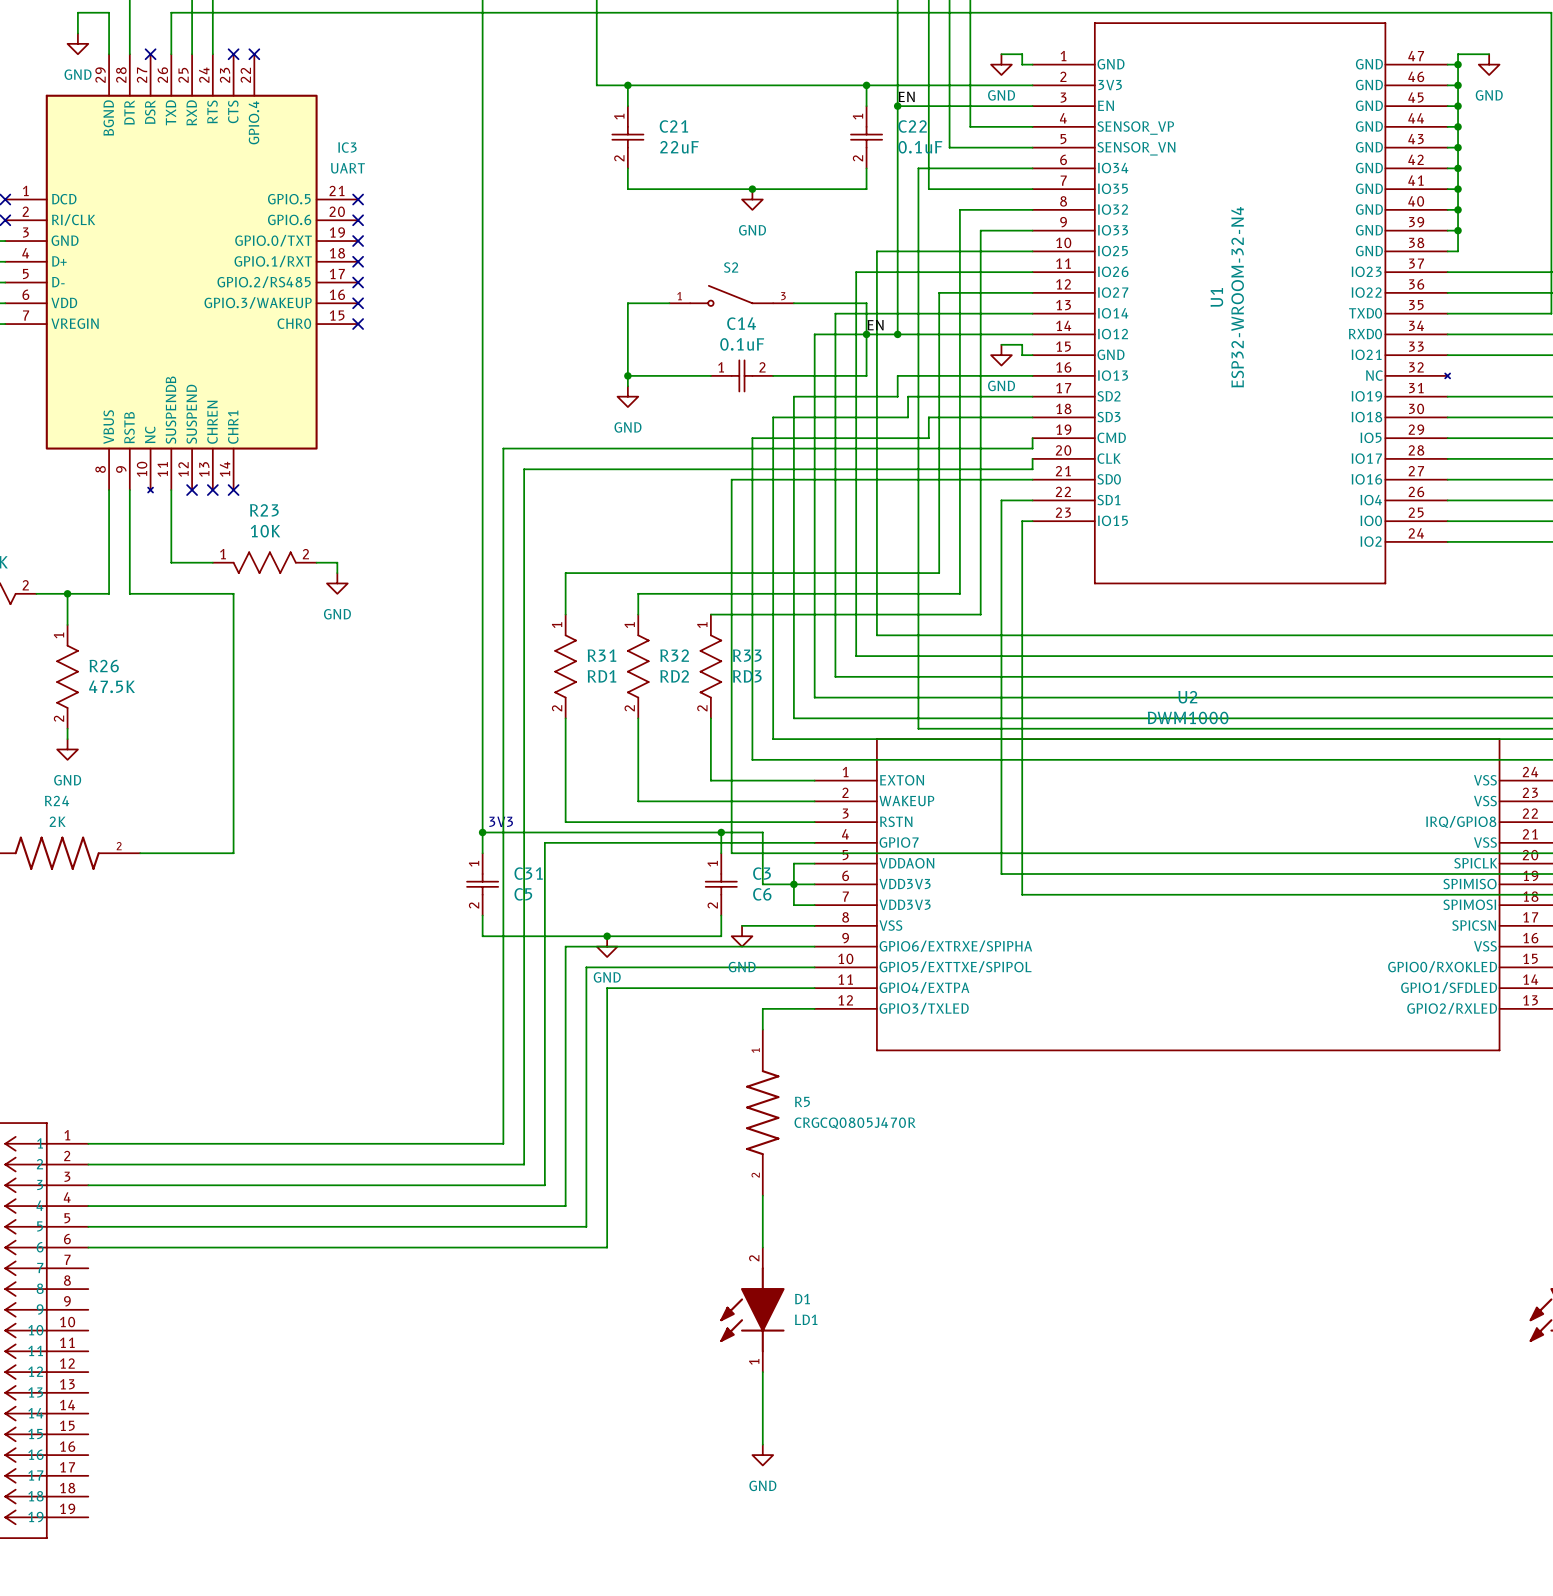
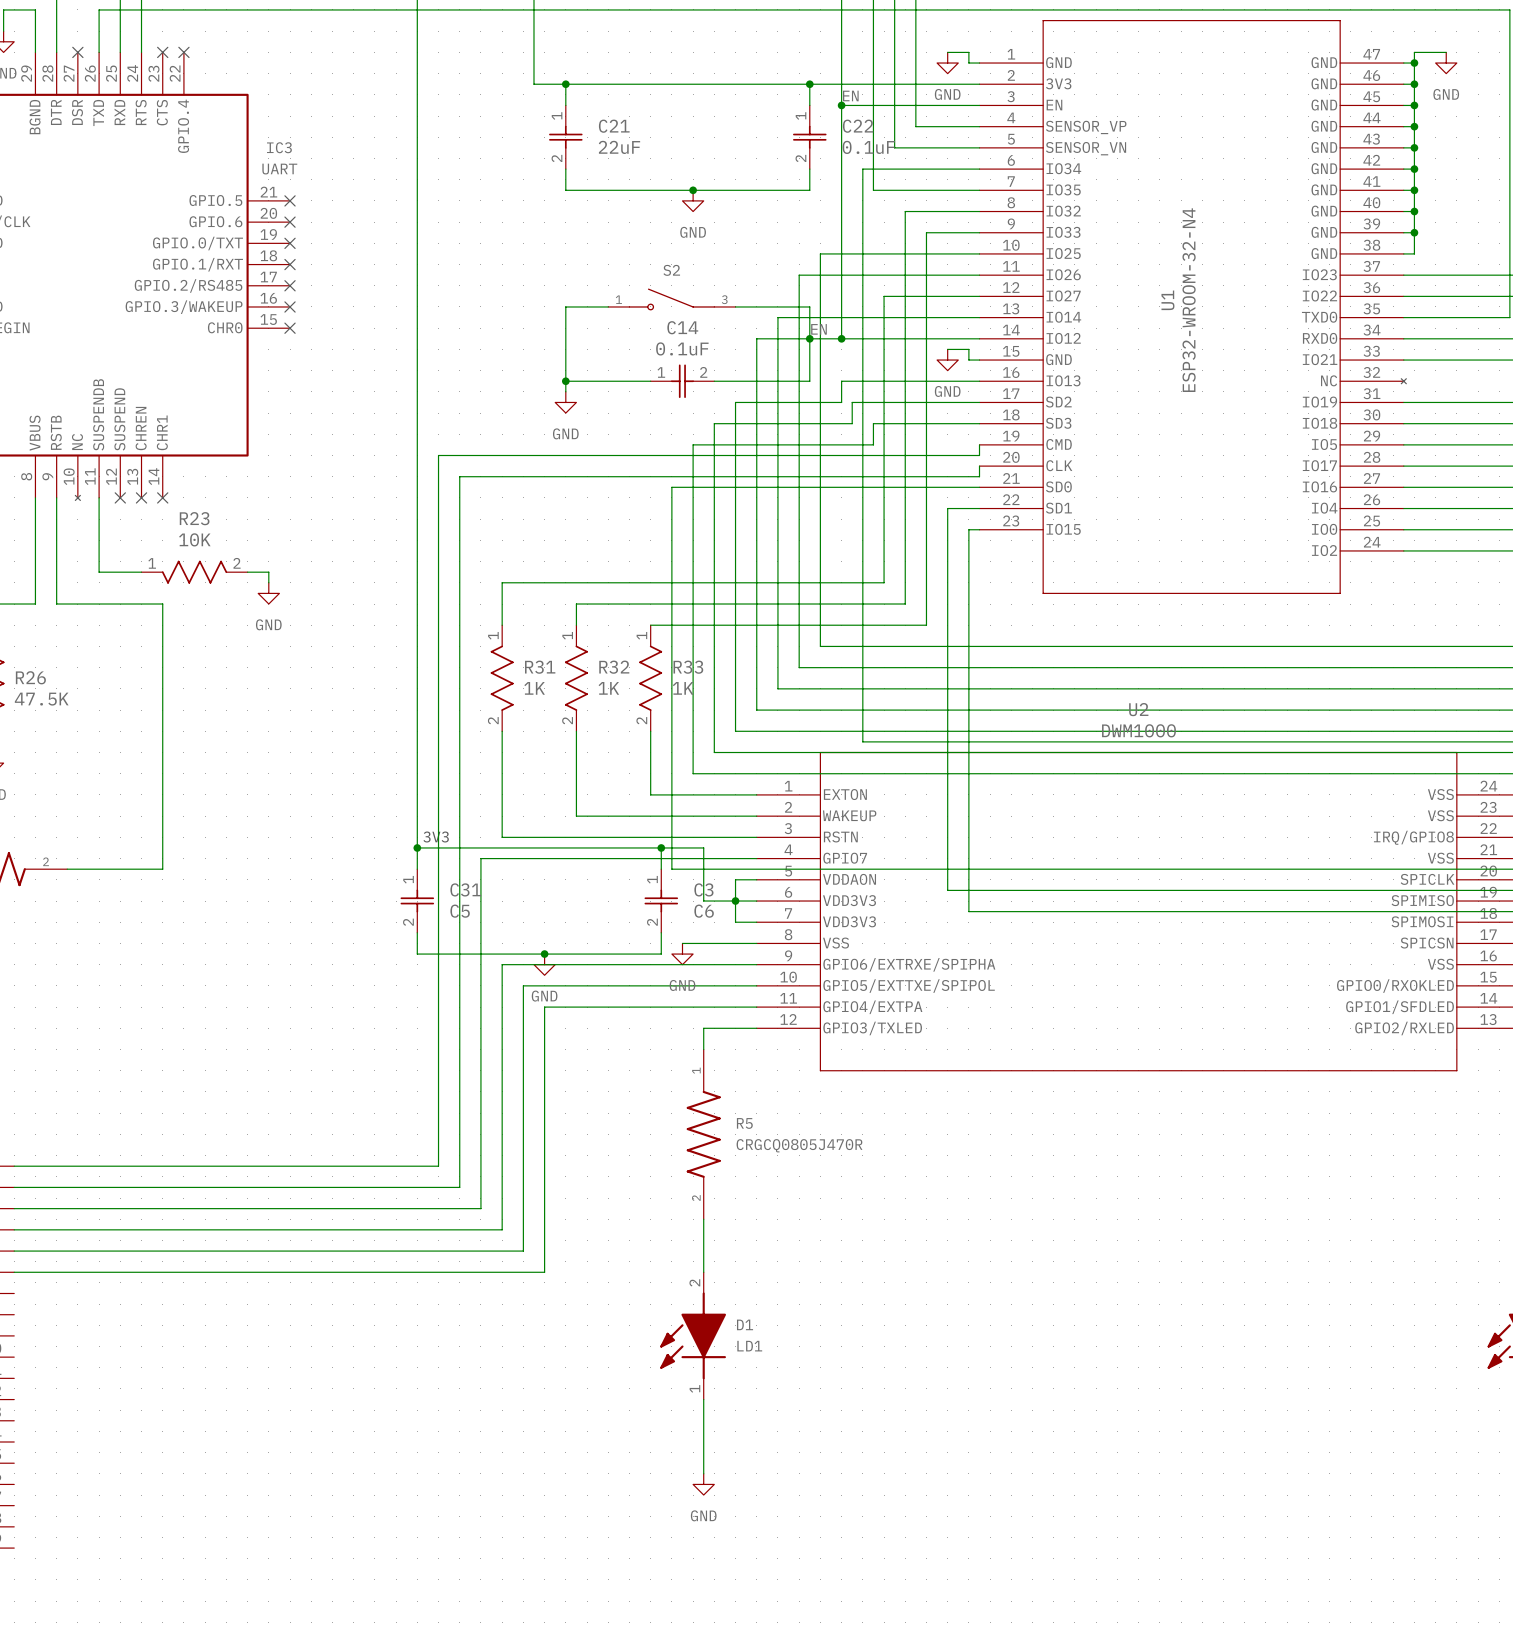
R31 flip: as is (565, 666) -> left-right (502, 678)
R31 value: RD1 (601, 676) -> 1K (534, 688)
R32 value: RD2 (674, 676) -> 1K (608, 688)
R33 value: RD3 (747, 676) -> 1K (683, 688)

